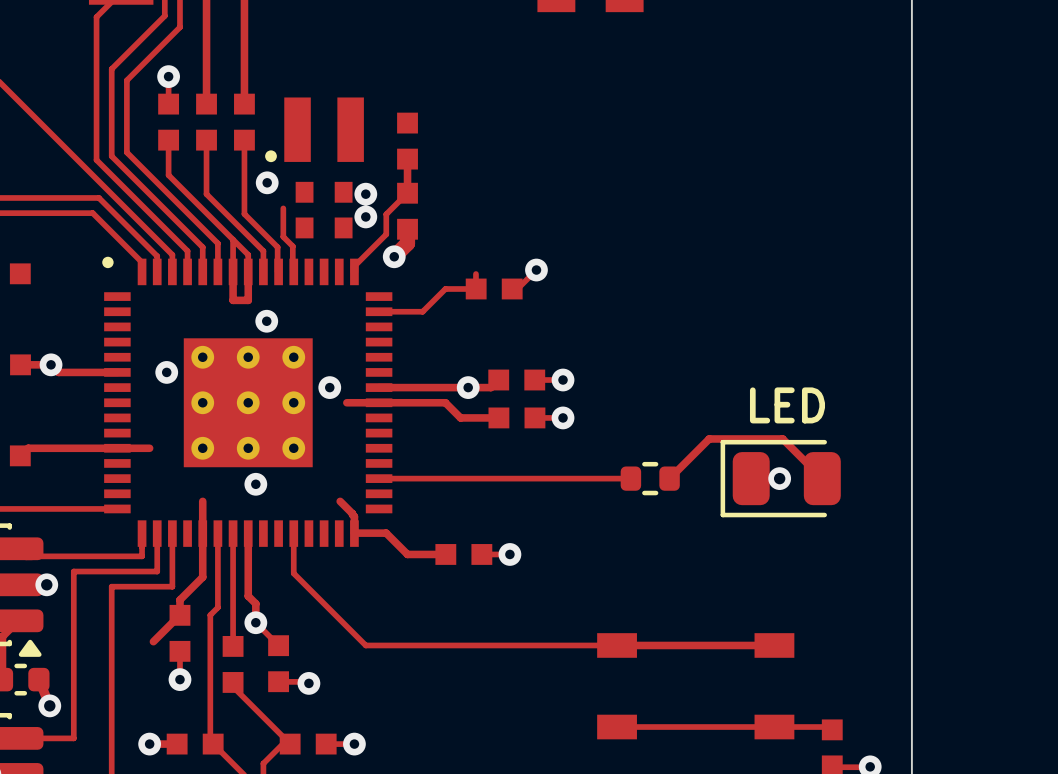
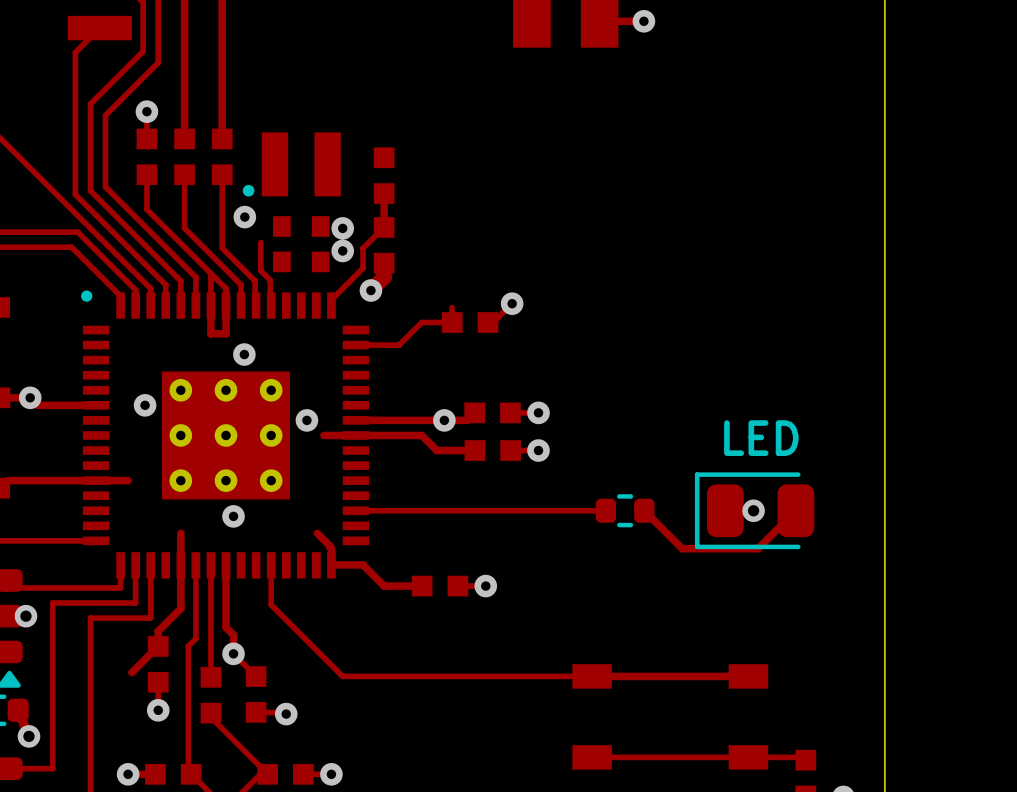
track: (669, 478) (709, 438) (782, 438) (822, 478) -> (644, 510) (682, 548) (757, 548) (795, 510)

